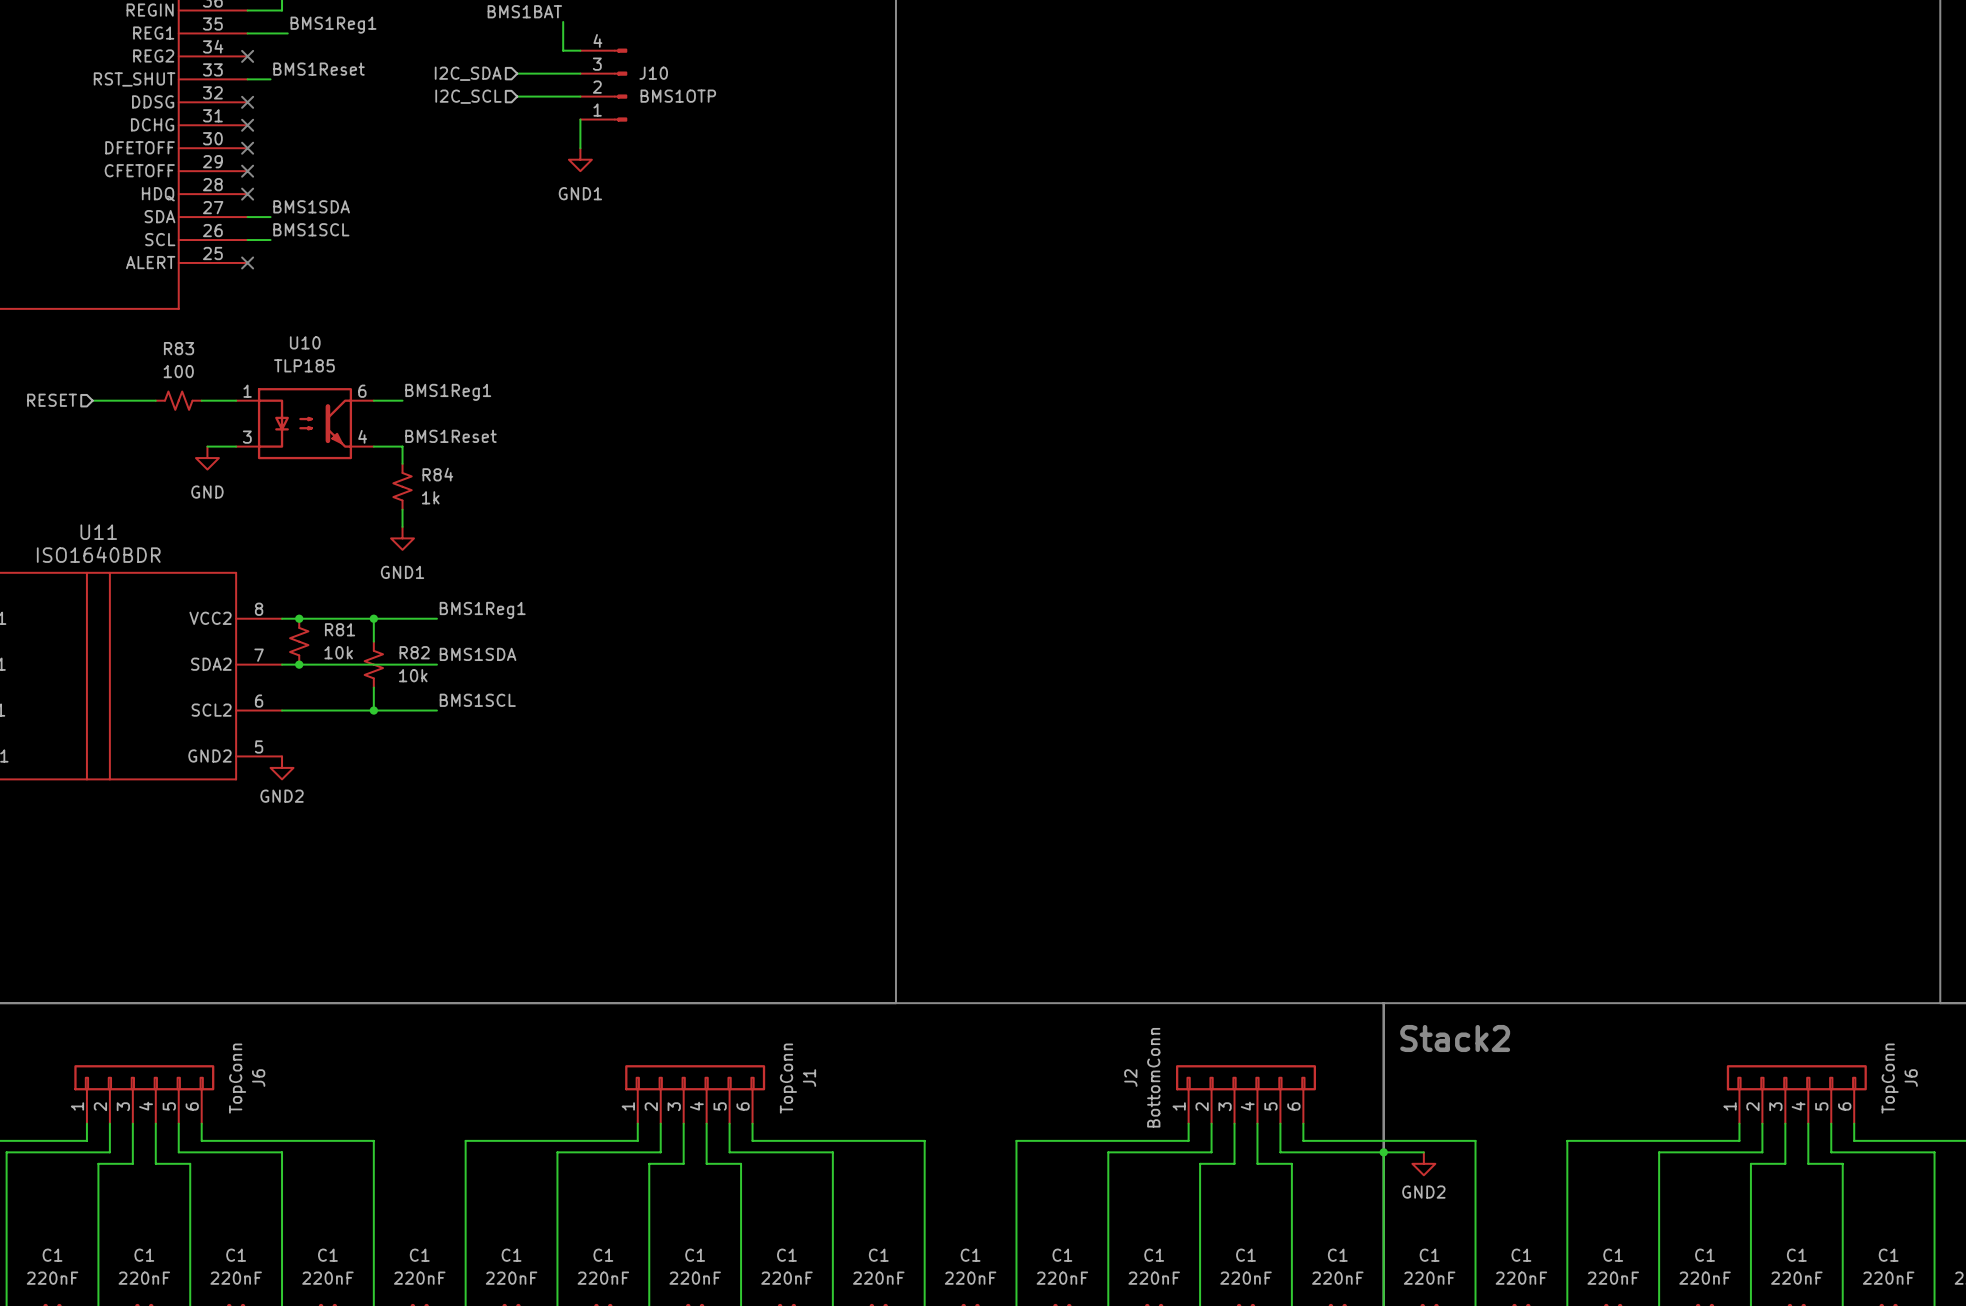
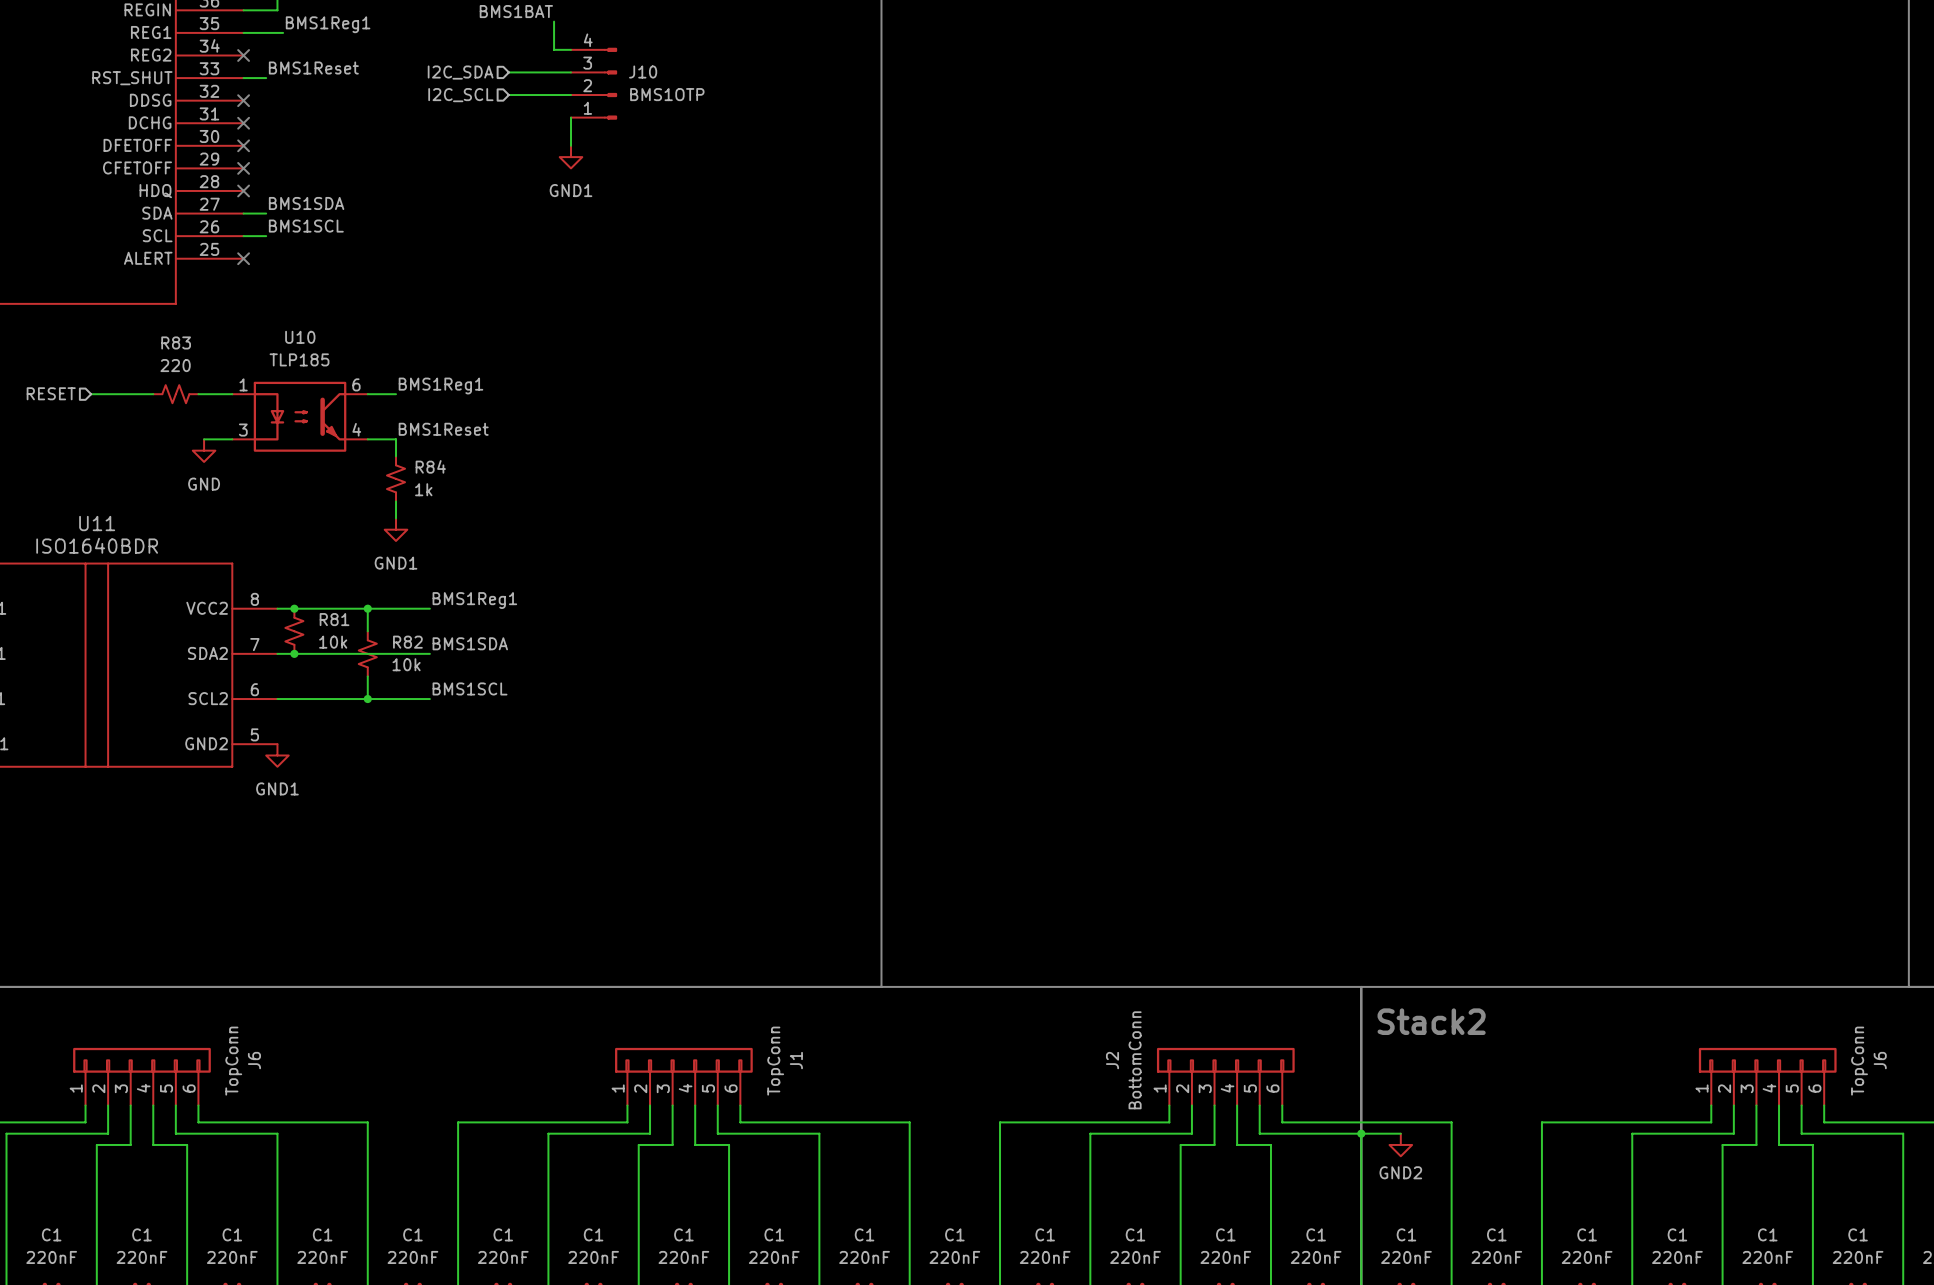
R83 value: 100 (178, 371) -> 220 (175, 365)
power symbol: GND2 (282, 767) -> GND1 (277, 755)

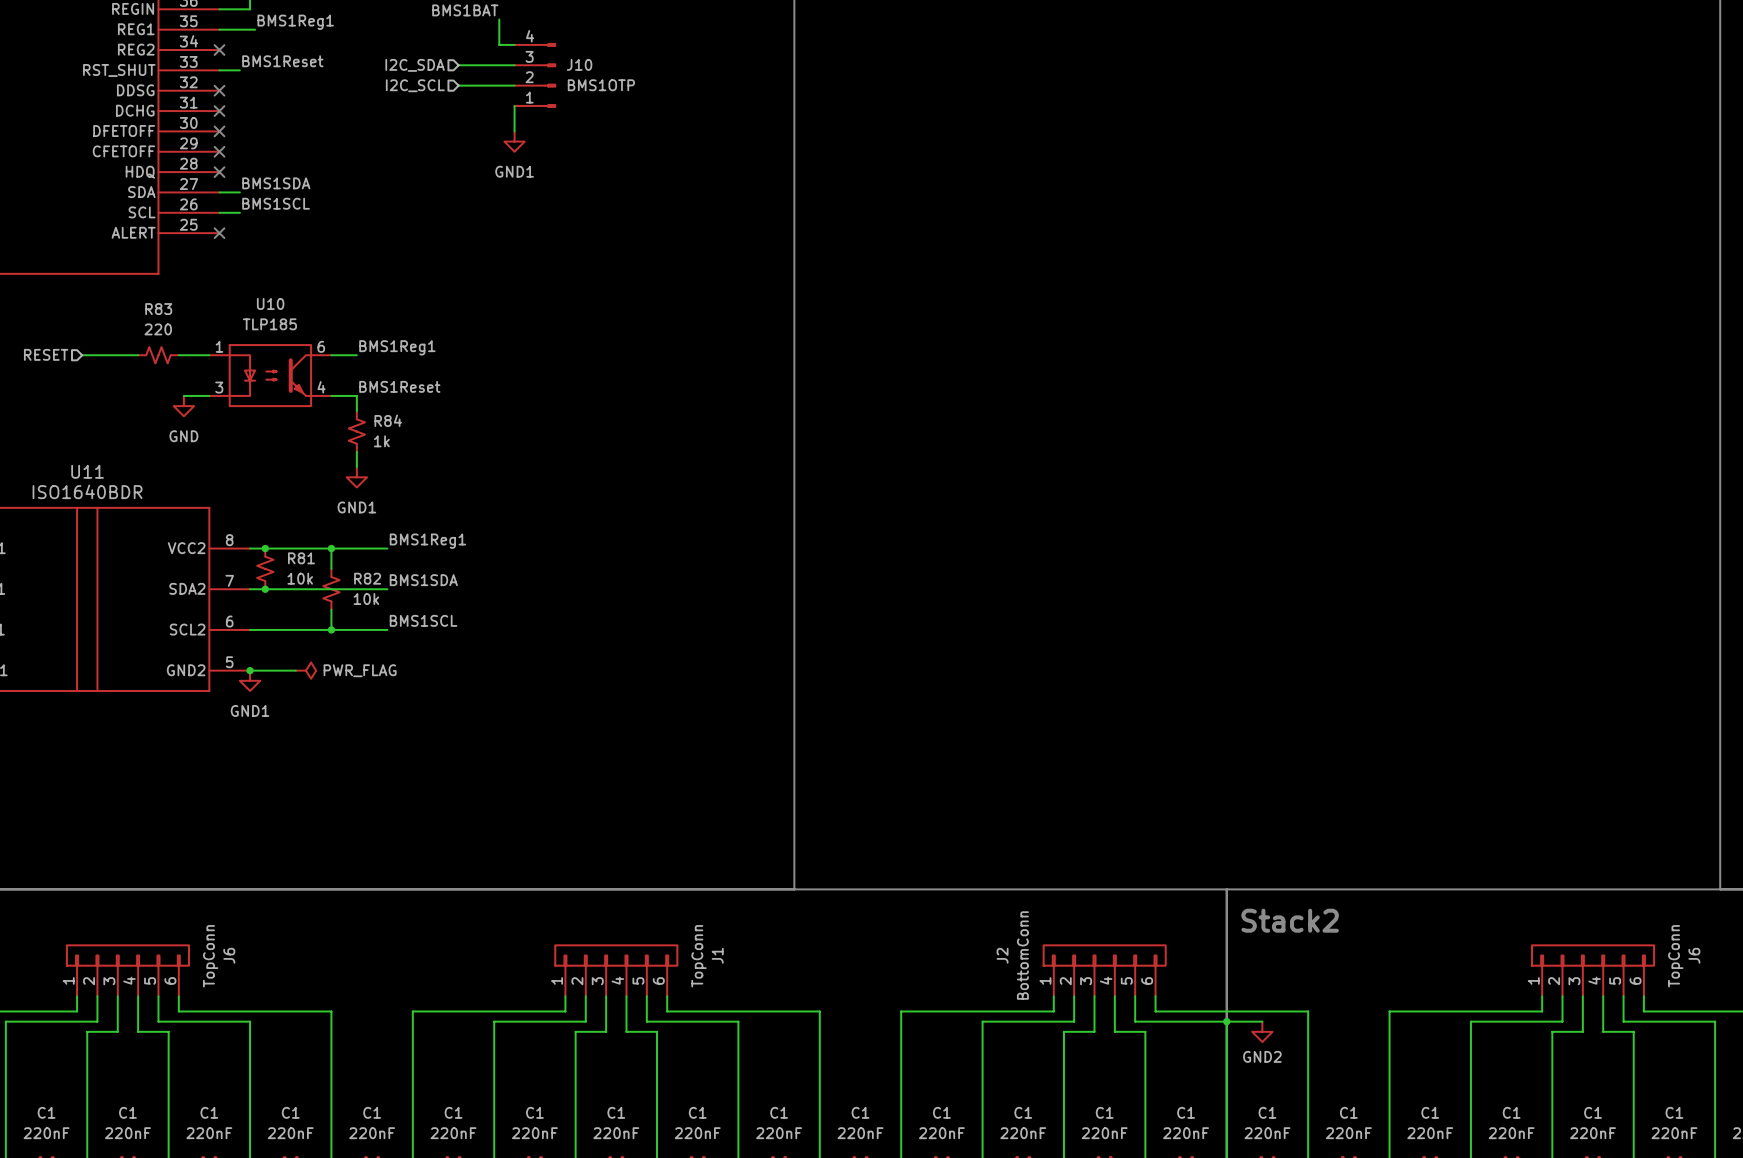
wire: none -> (250, 670) (295, 670)
junction: none -> (250, 670)
power symbol: none -> PWR_FLAG (306, 670)

